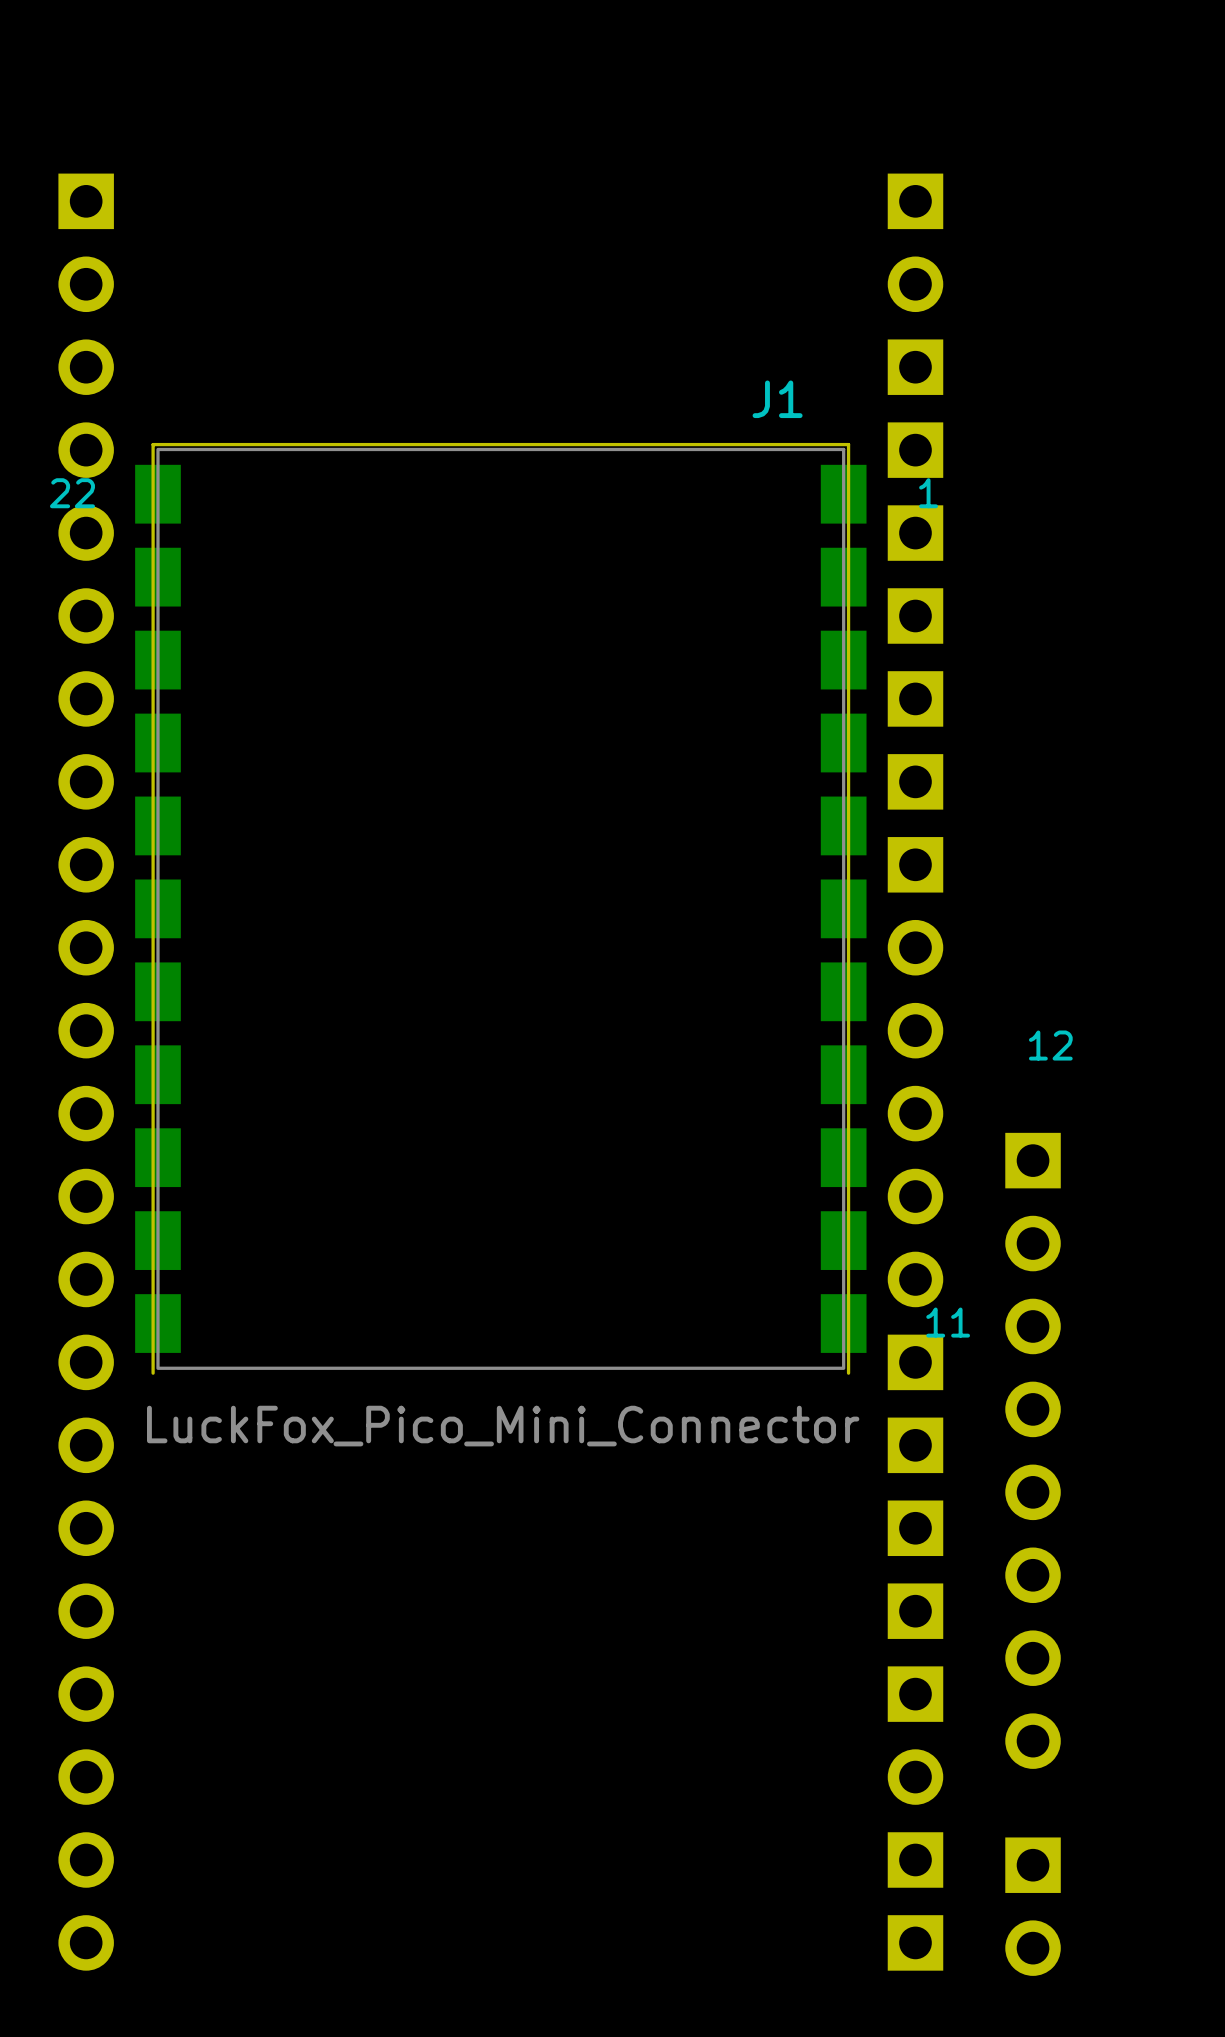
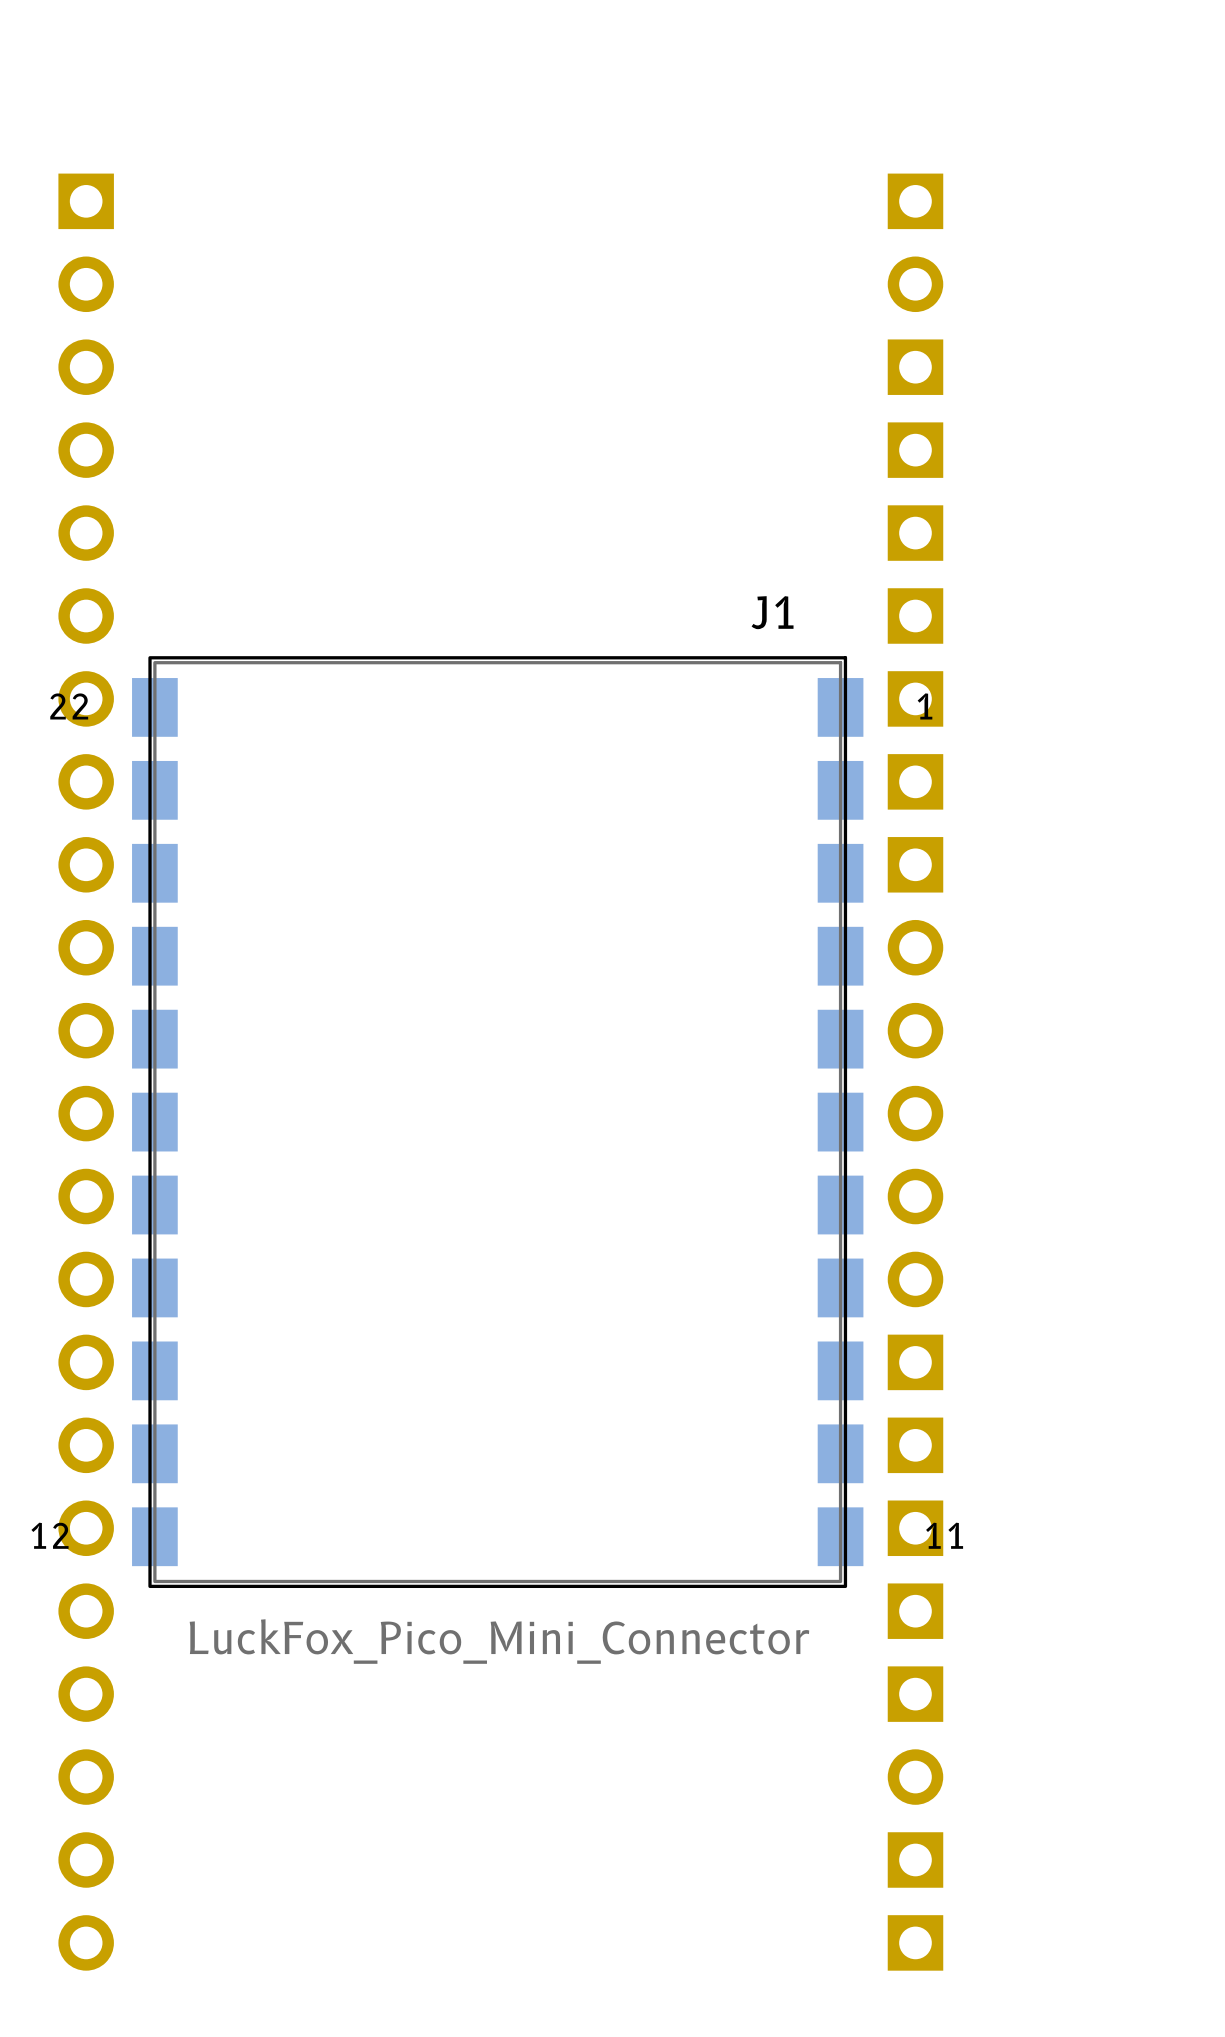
J1 footprint: [135, 442, 867, 1375] -> [132, 656, 864, 1589]
part: (1033, 1450) -> none
part: (1033, 1906) -> none

